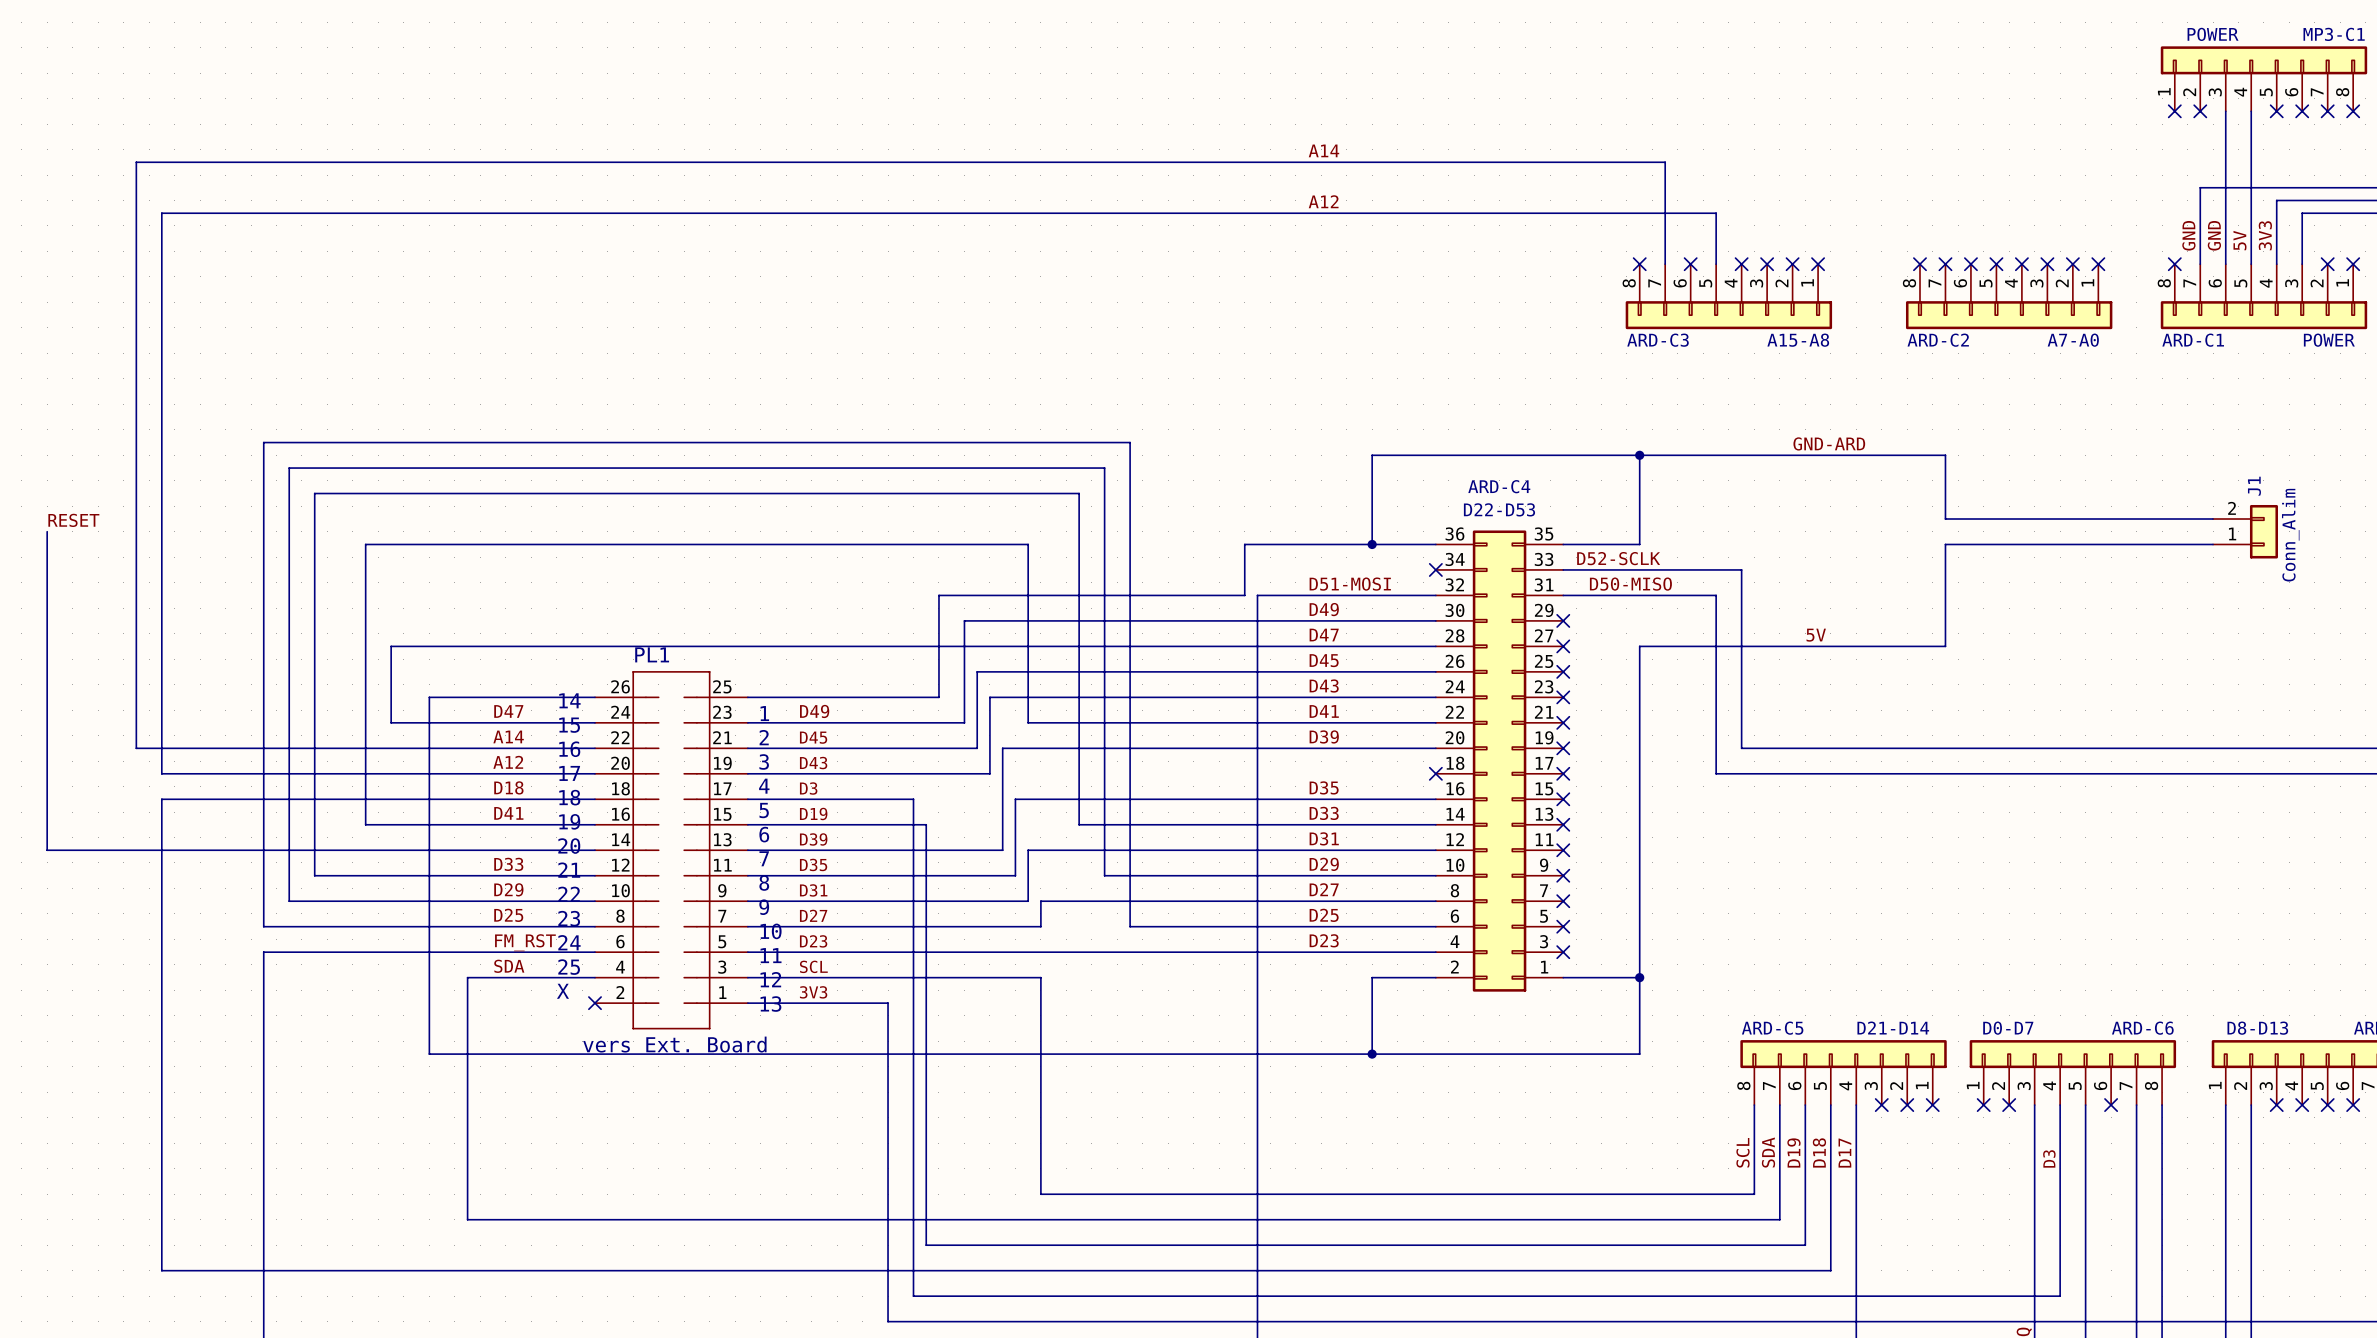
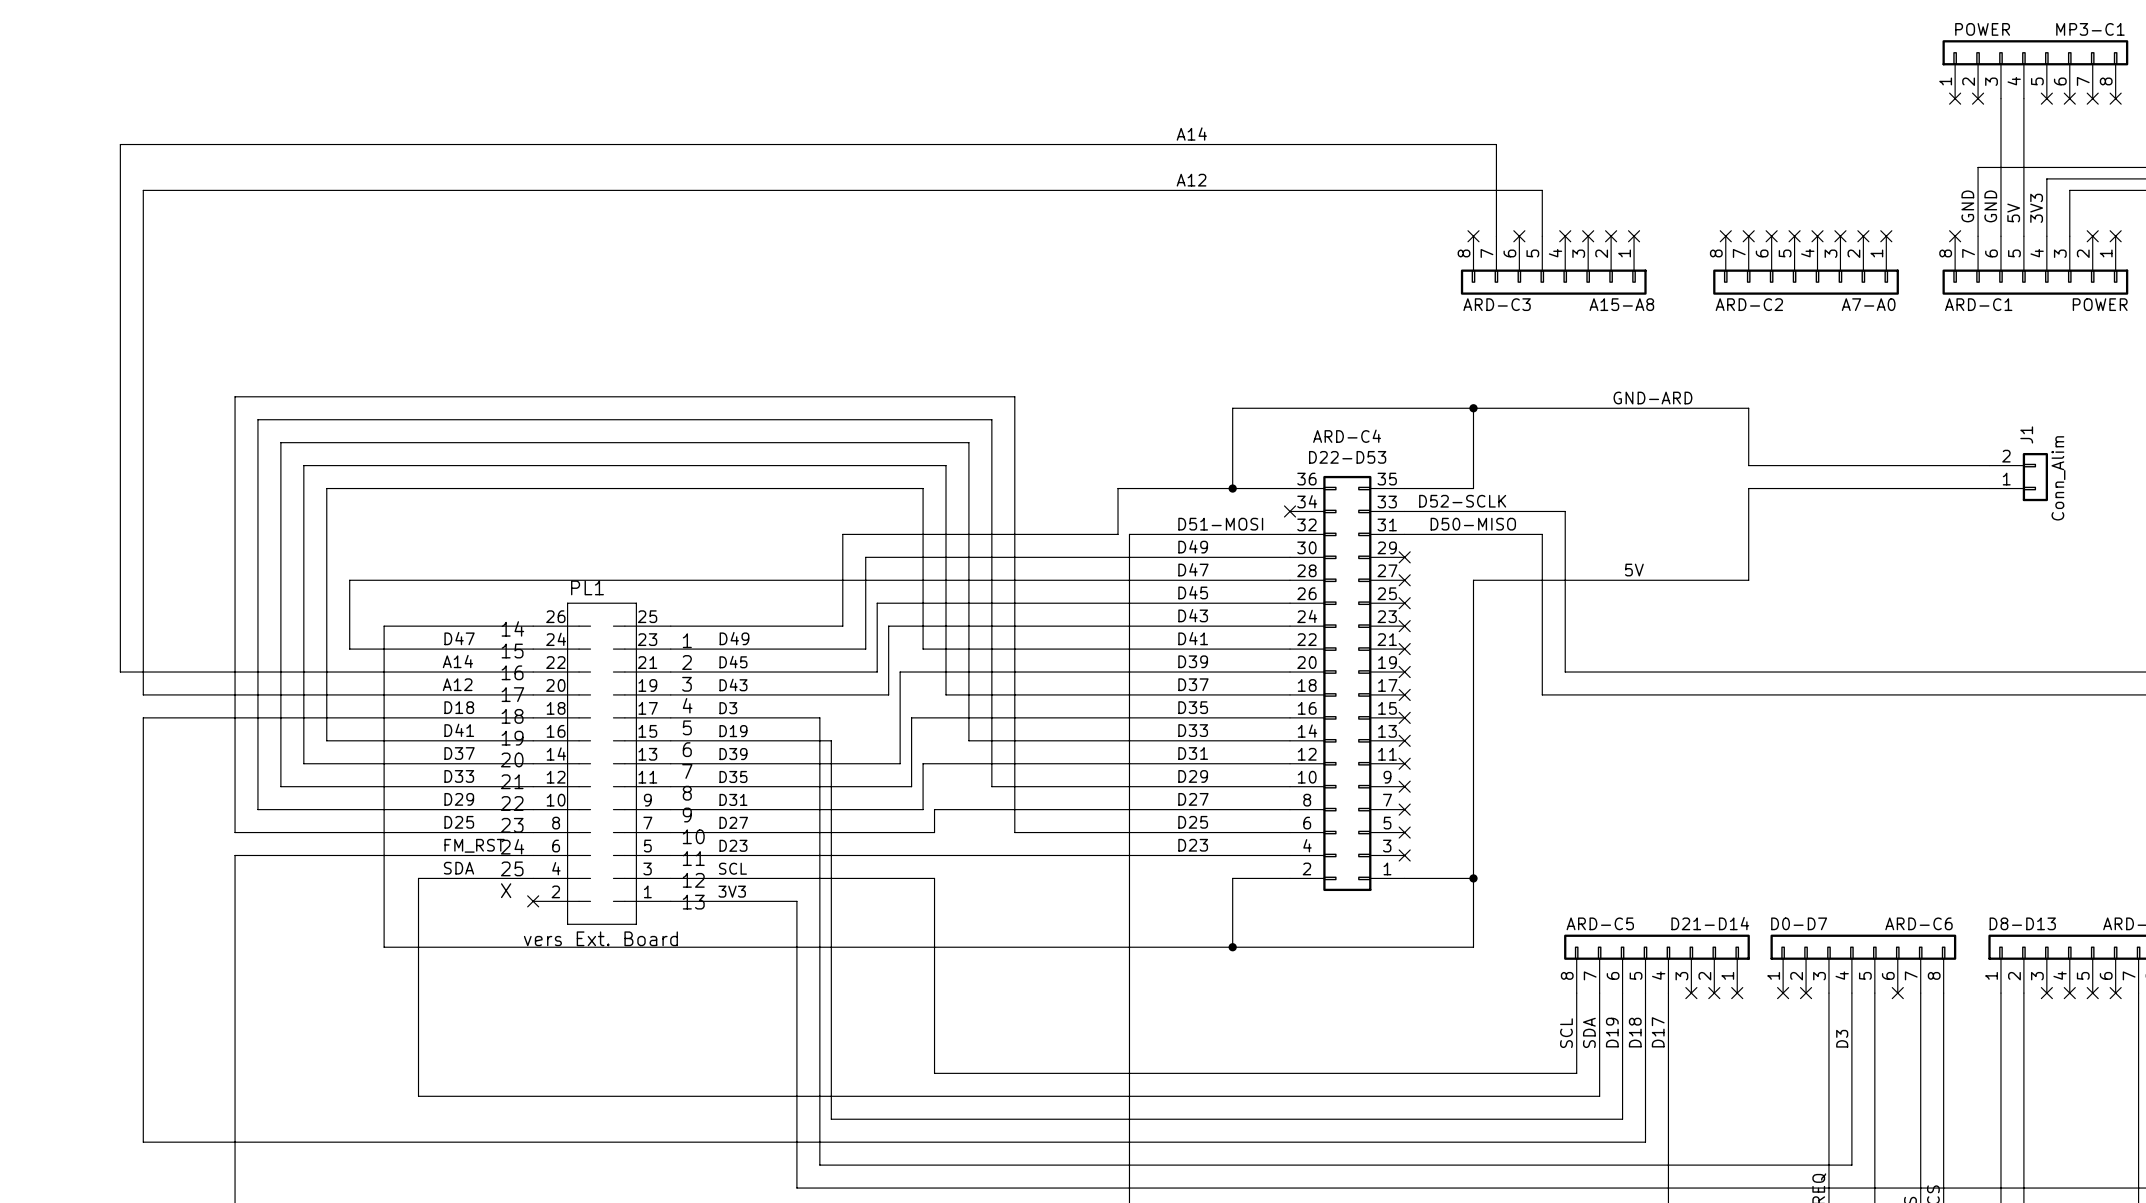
label: RESET (73, 520) -> none
wire: (47, 531) (47, 850) (340, 850) -> (1290, 694) (946, 694) (946, 465) (303, 465) (303, 763)
label: none -> D37 (1193, 684)
no-connect mark: (1435, 773) -> none
label: none -> D37 (459, 753)

